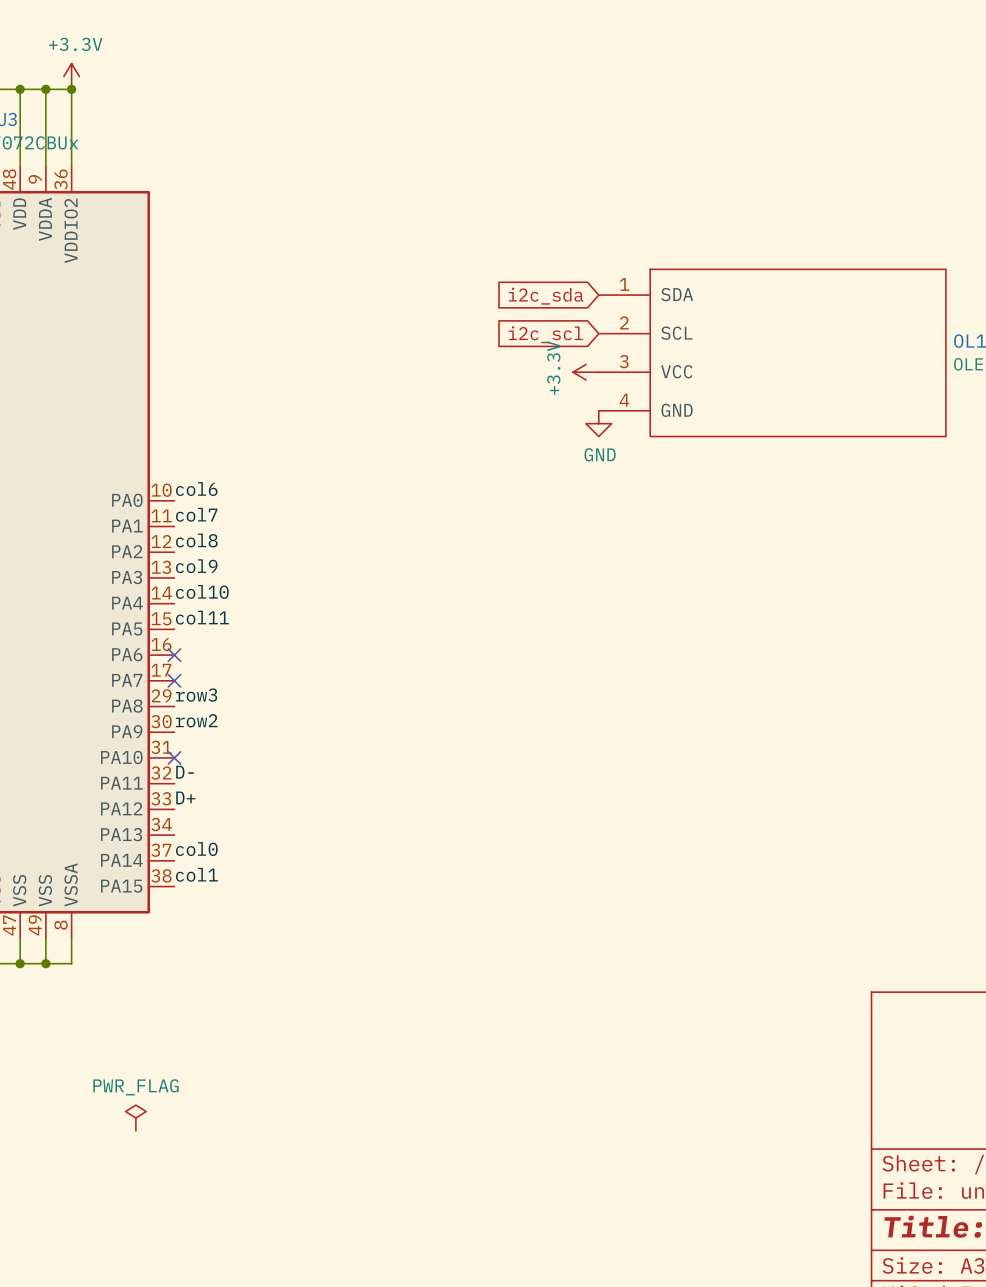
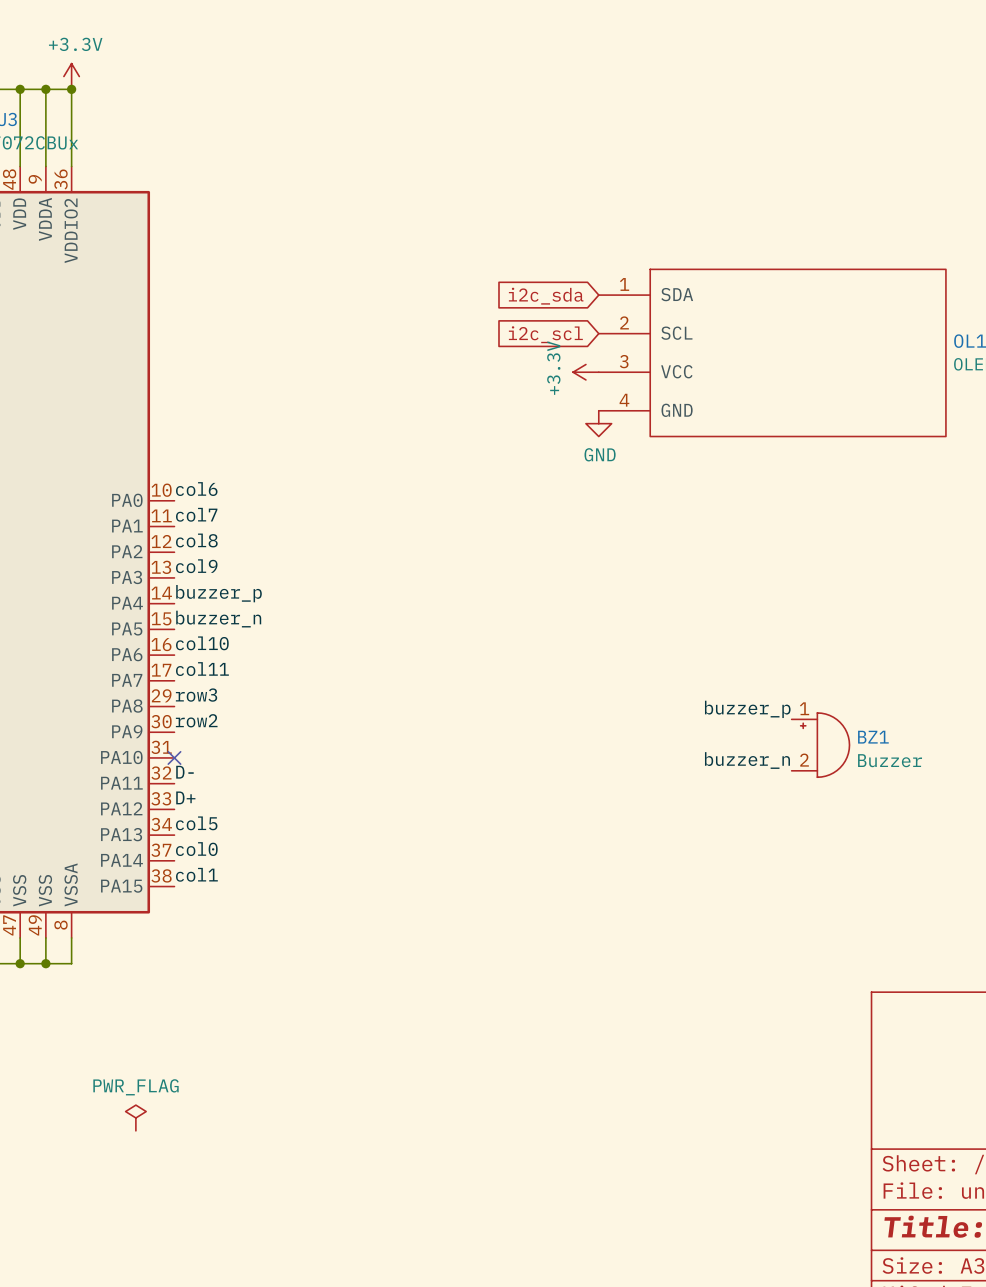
label: col10 (202, 591) -> buzzer_p (219, 593)
label: col11 (202, 617) -> buzzer_n (218, 619)
label: none -> col10 (202, 643)
no-connect mark: (174, 655) -> none
label: none -> col11 (202, 669)
no-connect mark: (174, 680) -> none
label: none -> buzzer_p (747, 709)
BZ1: none -> Buzzer (820, 745)
label: none -> buzzer_n (747, 760)
label: none -> col5 (196, 823)

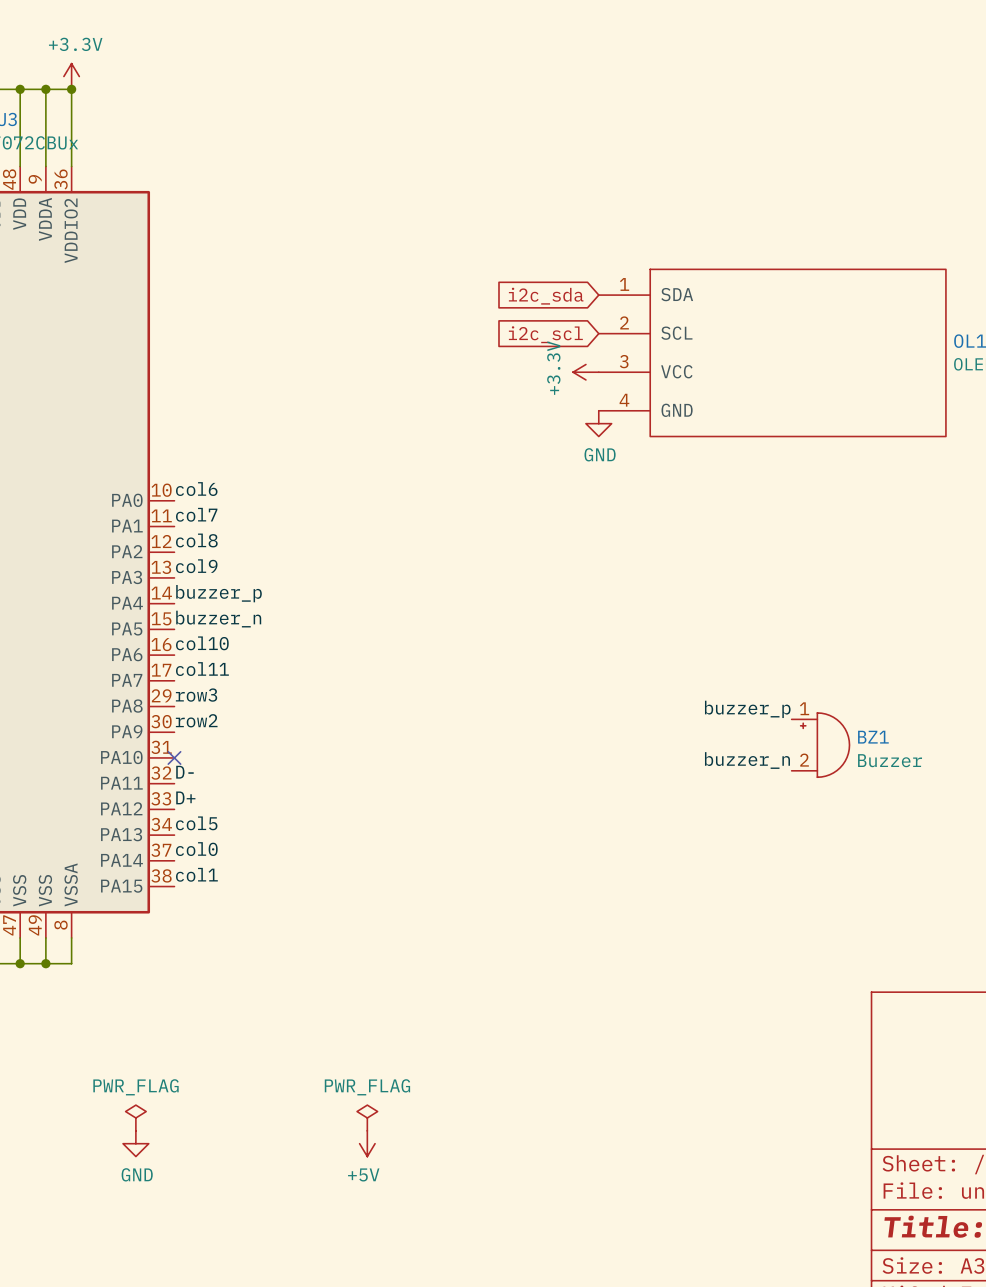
power symbol: none -> PWR_FLAG (367, 1117)
power symbol: none -> GND (135, 1143)
power symbol: none -> +5V (367, 1143)

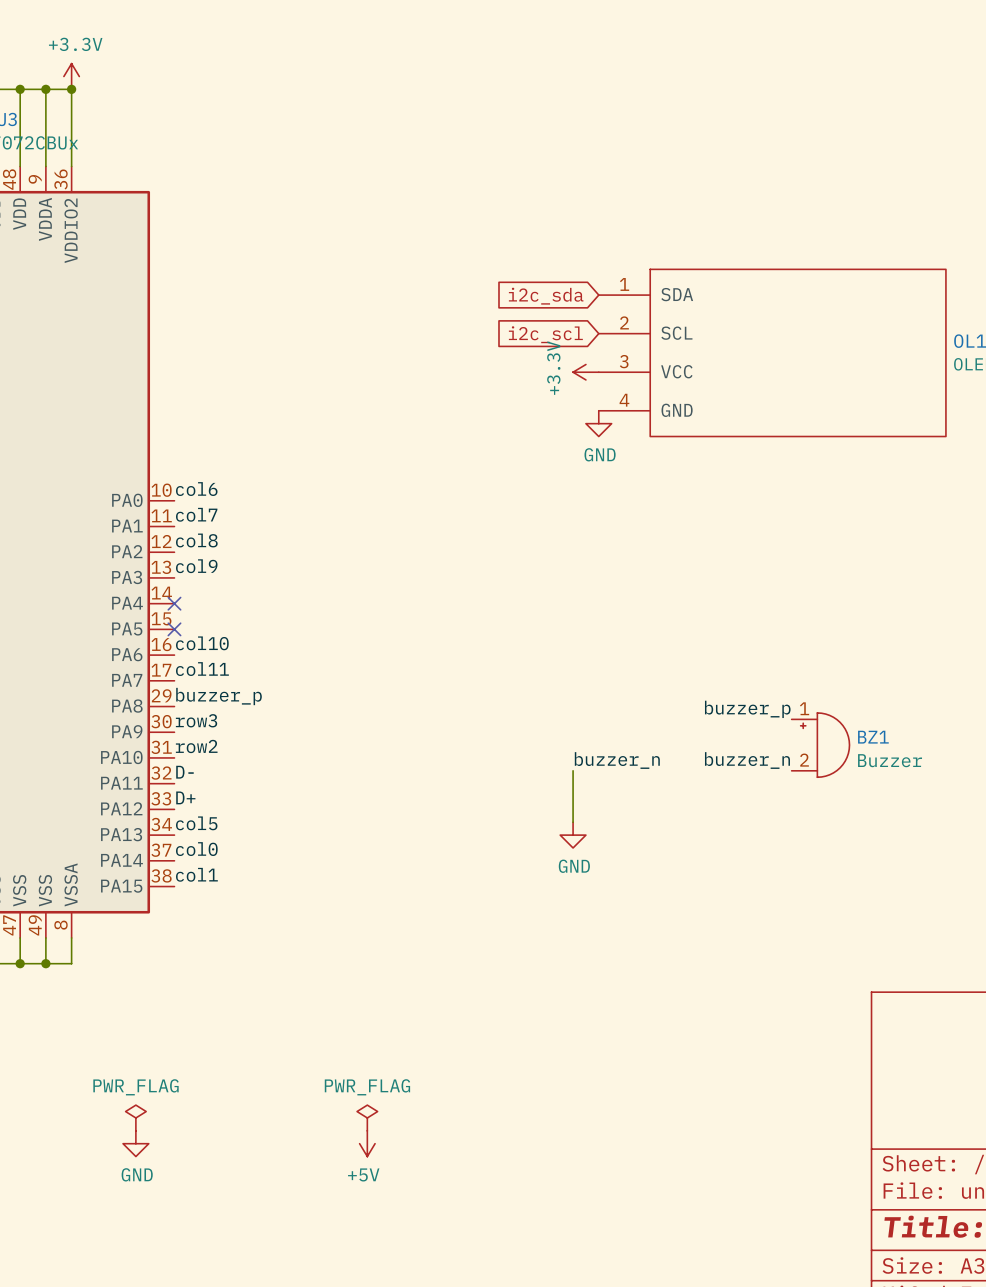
label: buzzer_p (219, 593) -> none
no-connect mark: none -> (174, 603)
label: buzzer_n (218, 619) -> none
no-connect mark: none -> (174, 629)
label: row3 (196, 695) -> buzzer_p (219, 696)
label: row2 (196, 720) -> row3 (196, 720)
label: none -> row2 (196, 746)
no-connect mark: (174, 757) -> none
label: none -> buzzer_n (617, 760)
wire: none -> (573, 770) (573, 822)
power symbol: none -> GND (573, 835)

